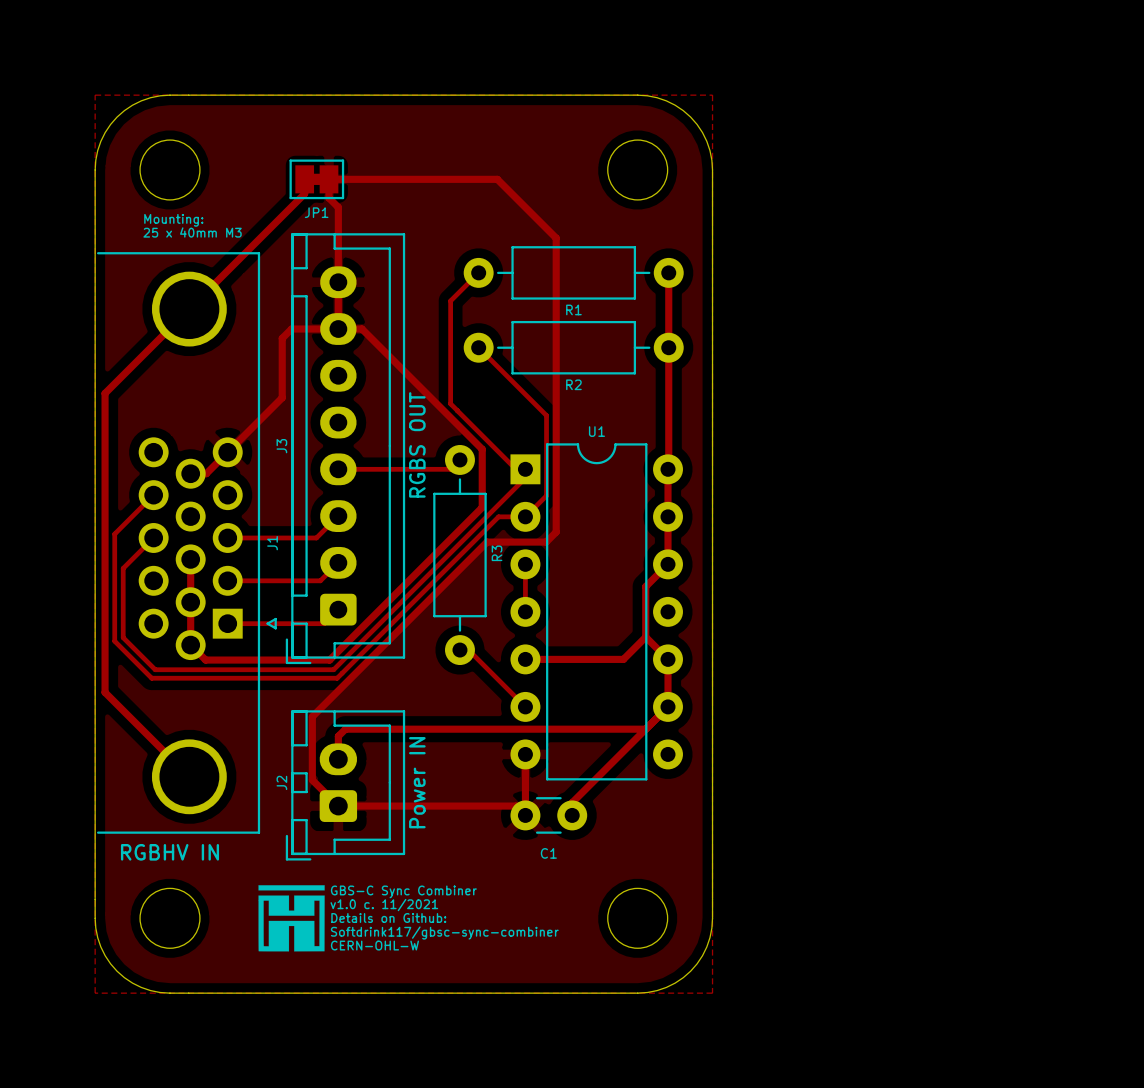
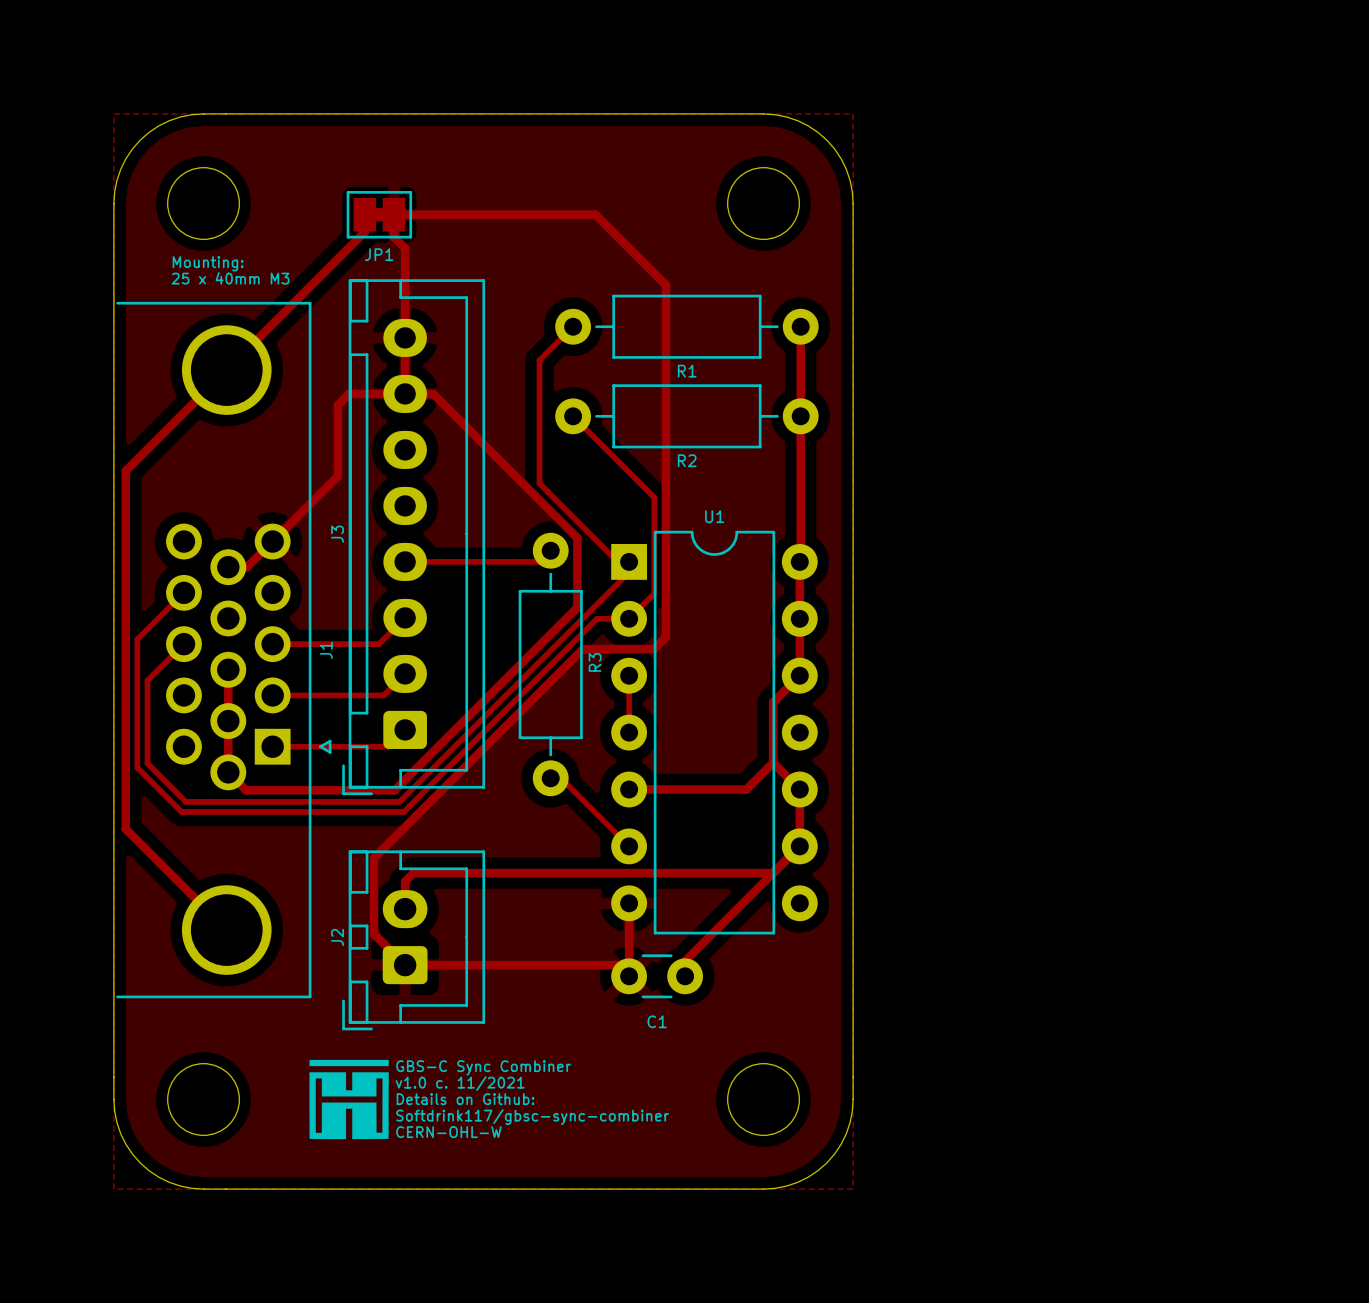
text: RGBS OUT (417, 444) -> none
text: Power IN (417, 782) -> none
text: RGBHV IN (169, 852) -> none

